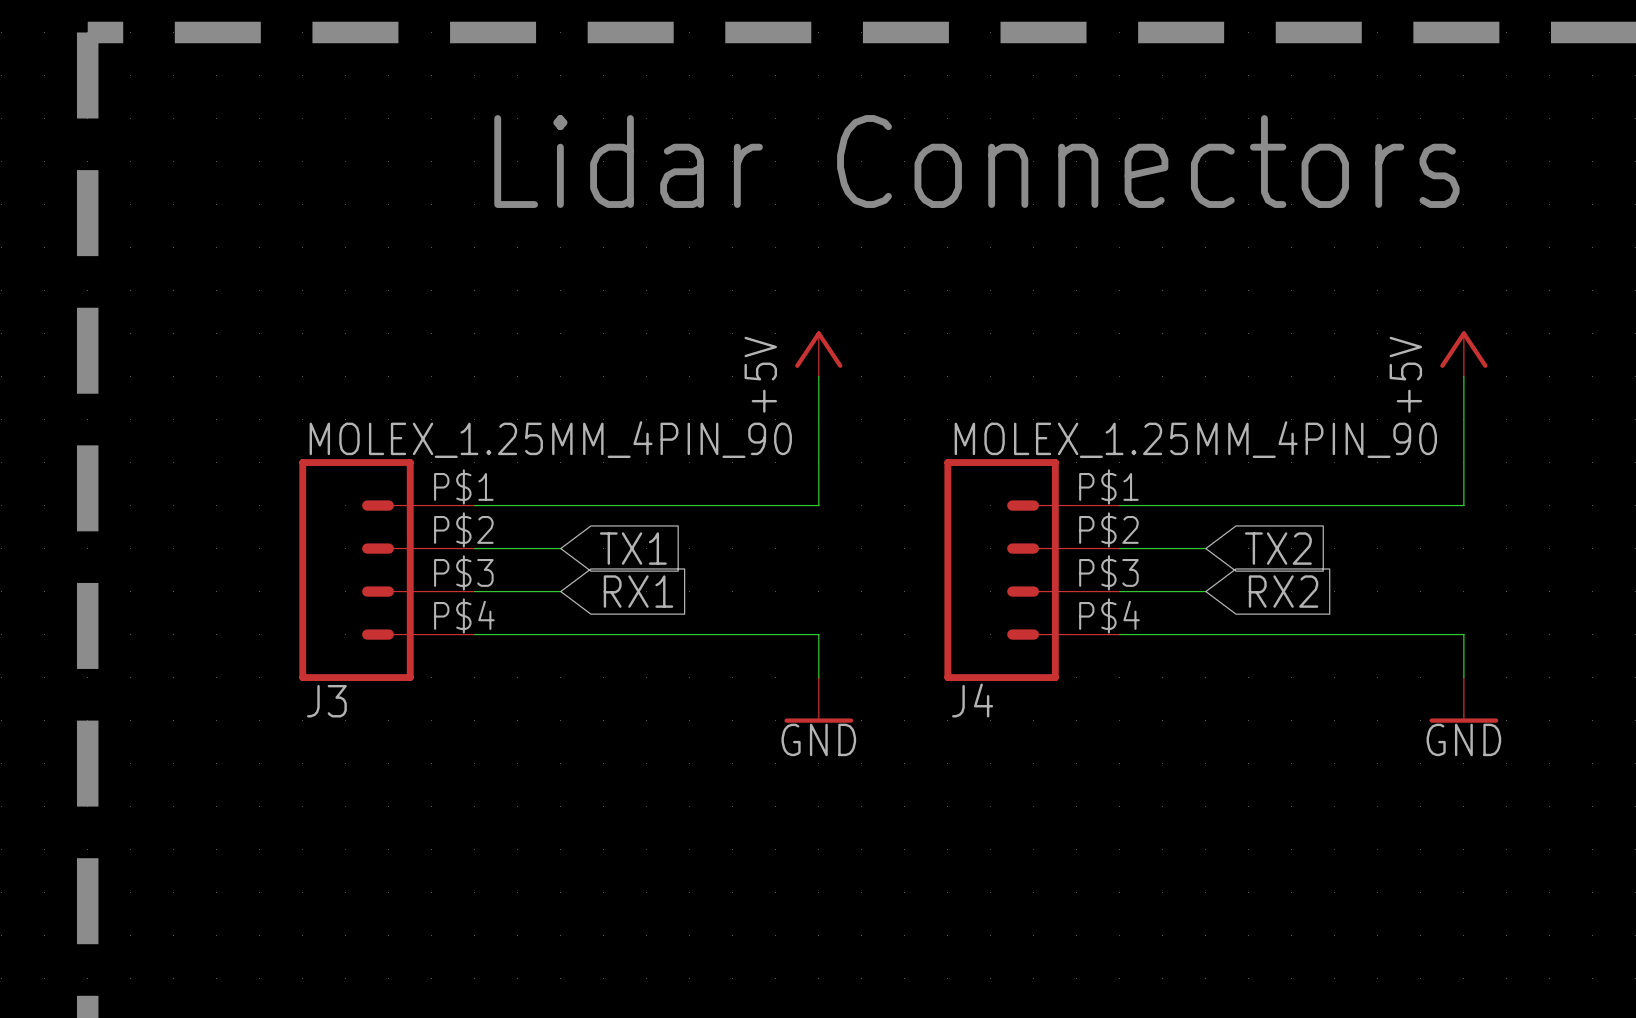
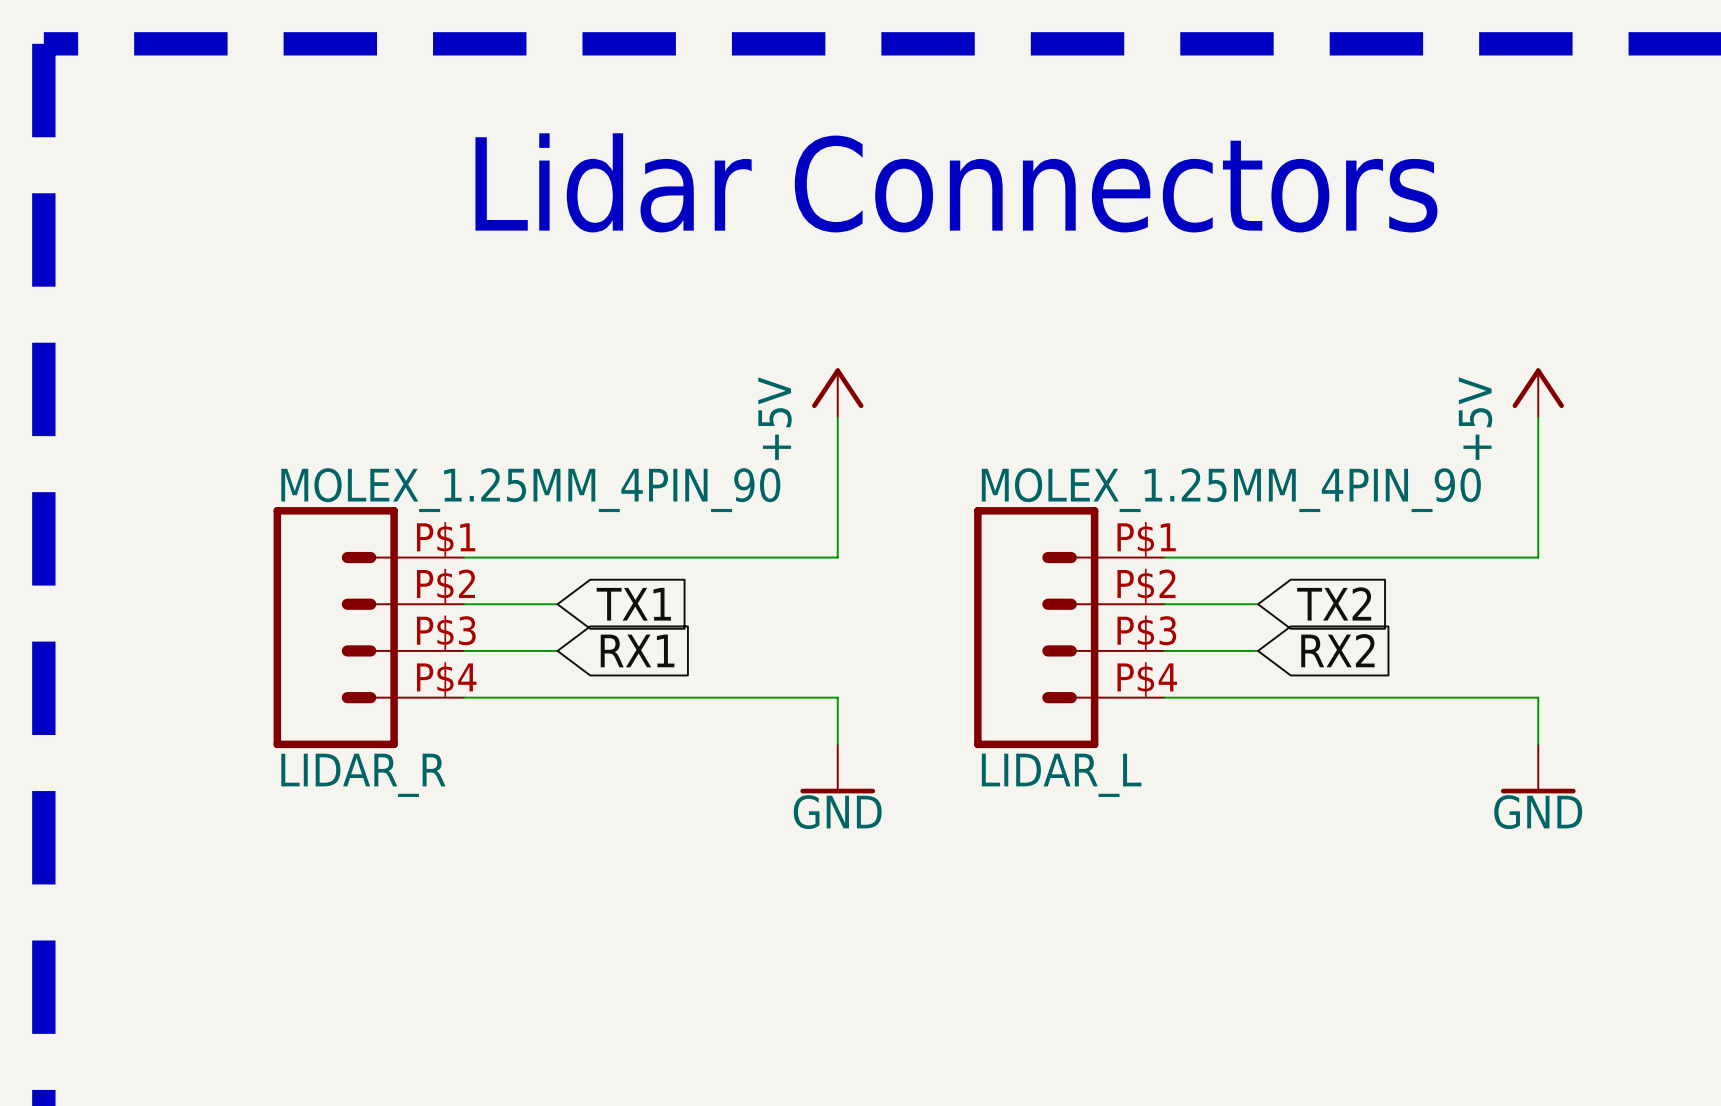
J4 name: J4 (972, 700) -> LIDAR_L (1061, 775)
J3 name: J3 (326, 701) -> LIDAR_R (363, 775)

